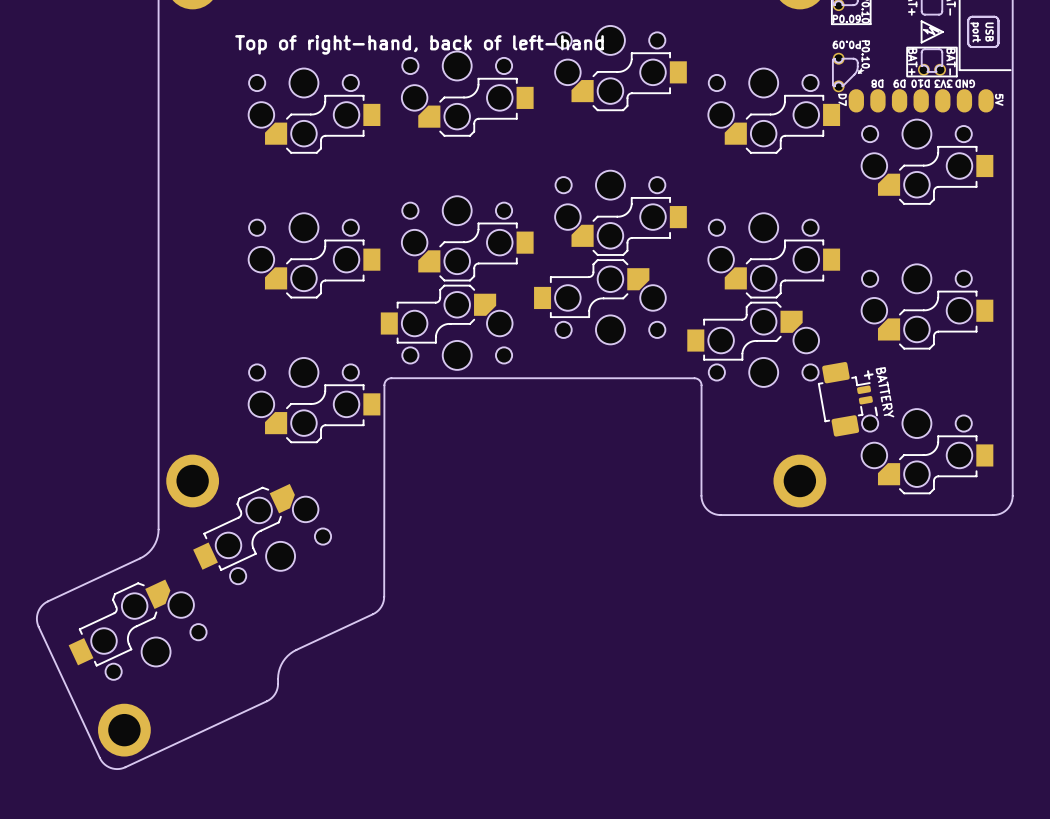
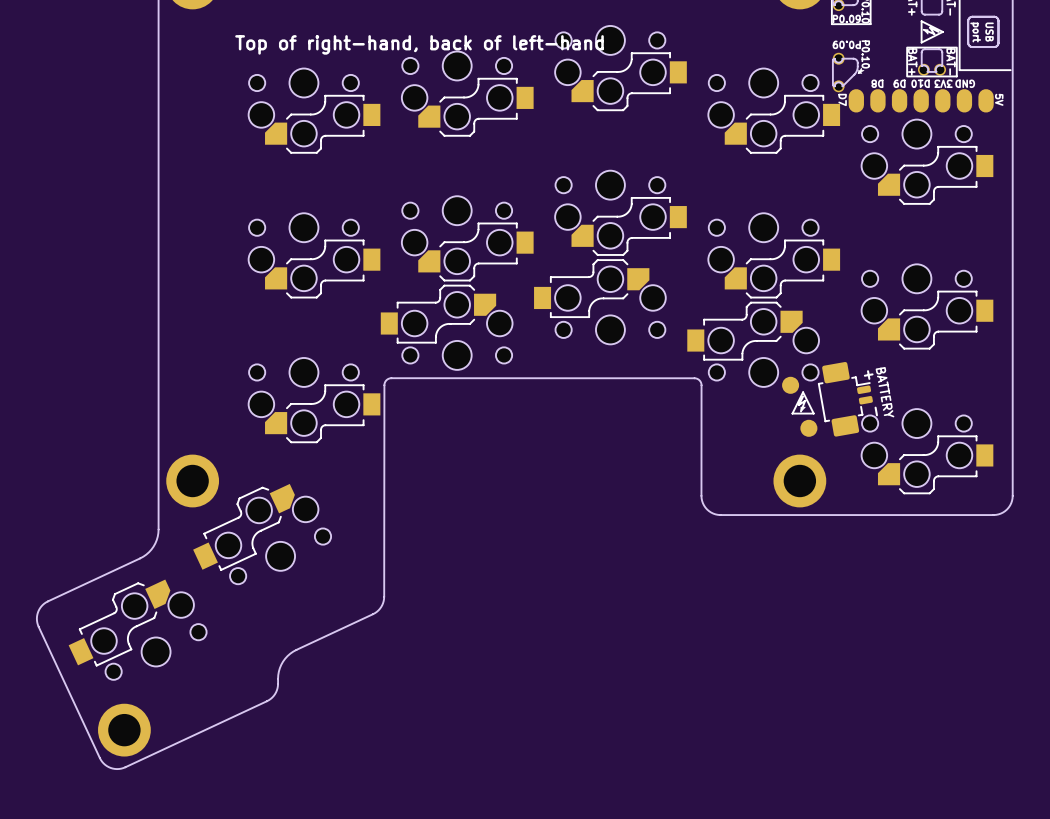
part: none -> (790, 385)
drawing: none -> [792, 391, 815, 415]
part: none -> (808, 428)

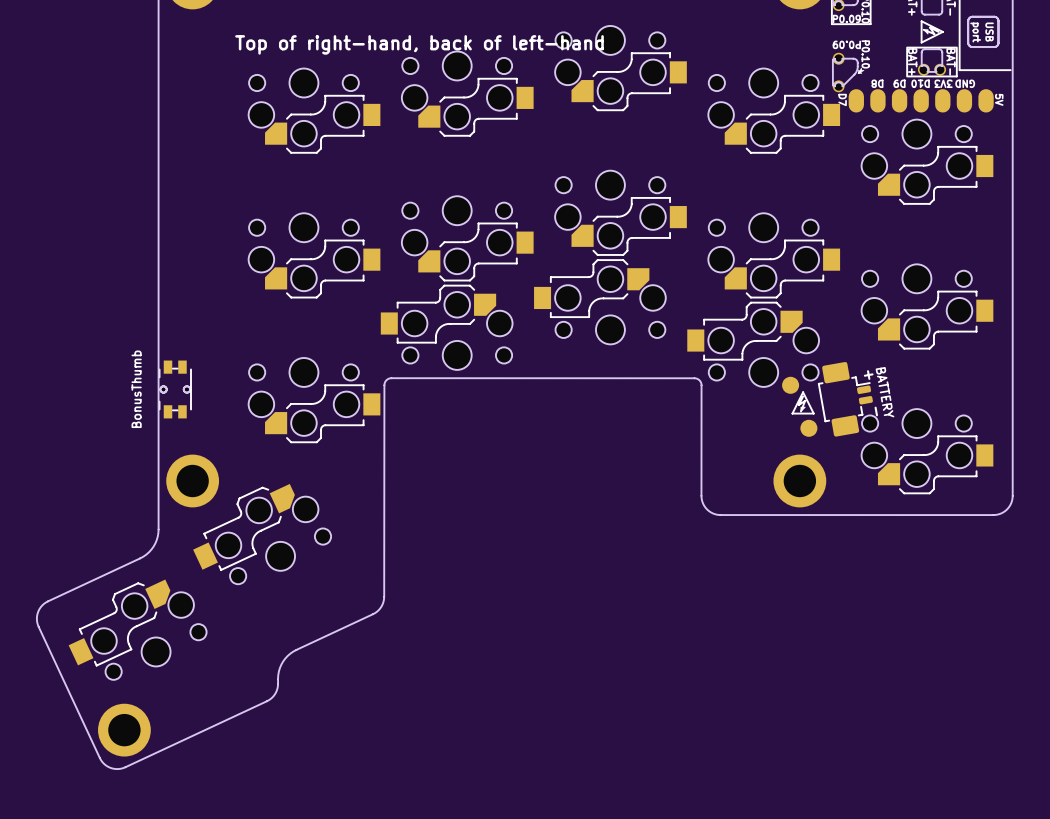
BonusThumb: none -> (175, 389)
part: none -> (175, 389)

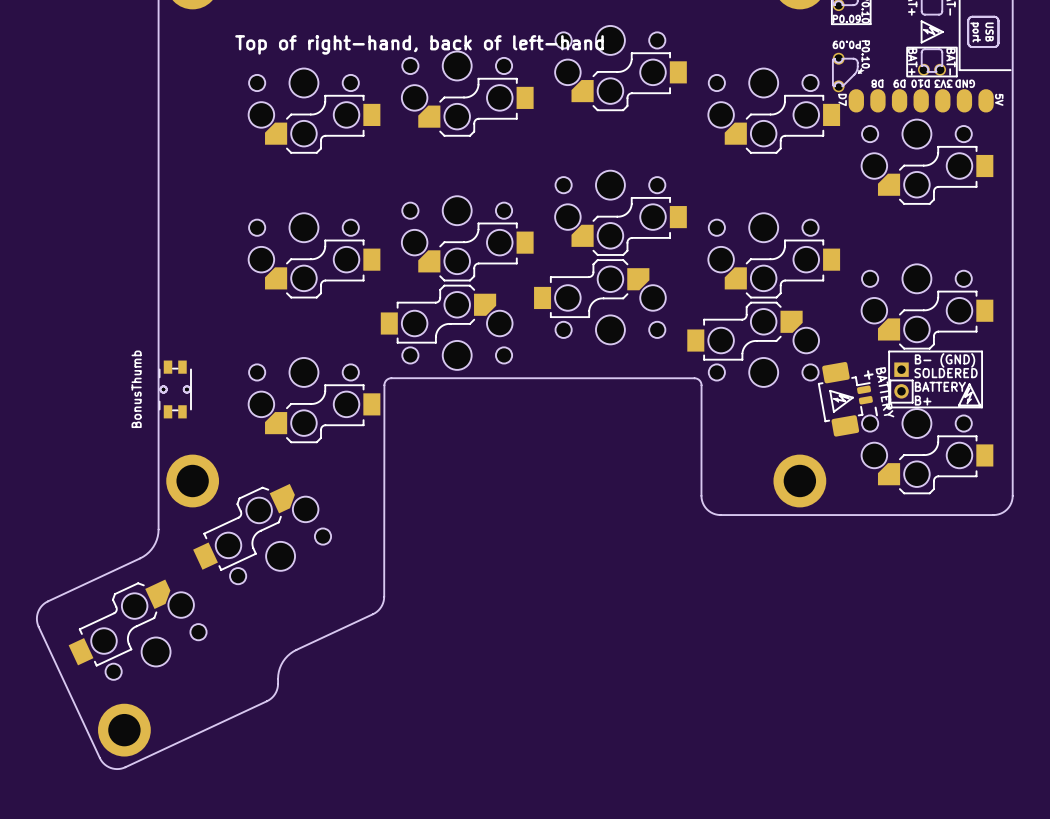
line: none -> (889, 351) (982, 351) (982, 407) (889, 407) (889, 351)
text: none -> B- (GND) (945, 360)
text: none -> SOLDERED (946, 373)
line: none -> (890, 380) (912, 380) (912, 402) (890, 402) (890, 380)
part: none -> (901, 380)
part: (790, 385) -> none
text: none -> BATTERY (940, 386)
drawing: none -> [829, 390, 854, 413]
text: none -> B+ (923, 400)
drawing position: (803, 402) -> (969, 394)
part: (808, 428) -> none

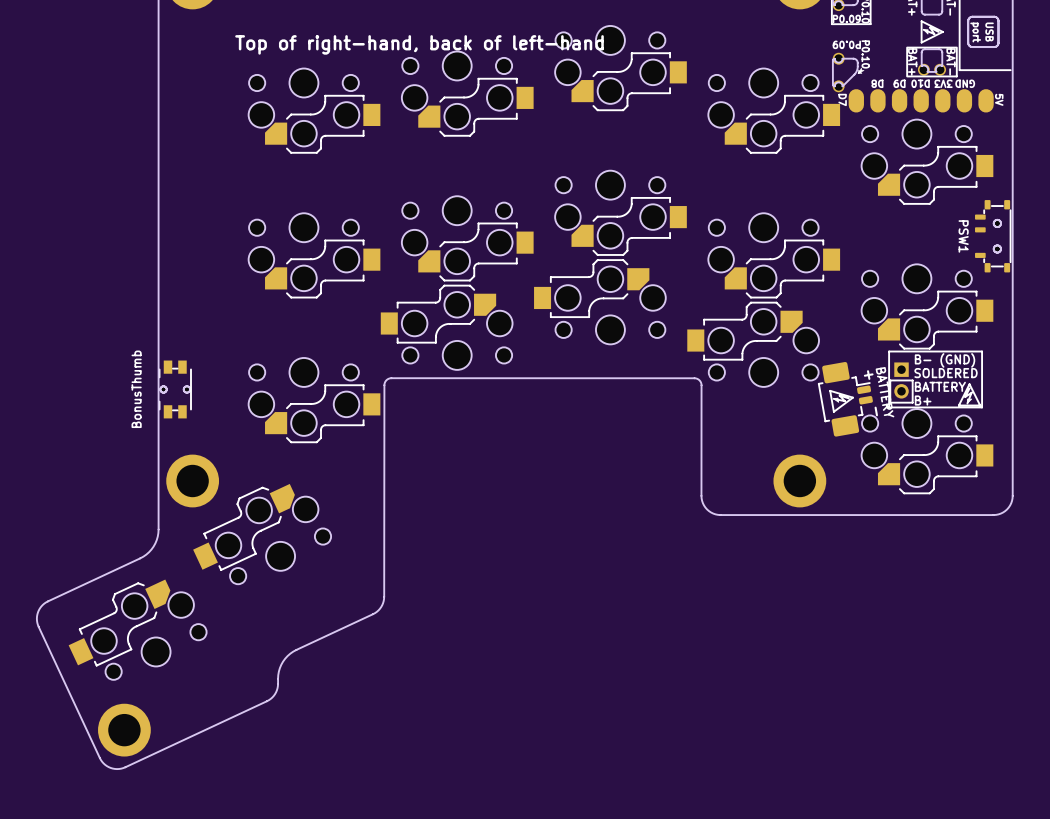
PSW1: none -> (993, 236)
part: none -> (997, 236)

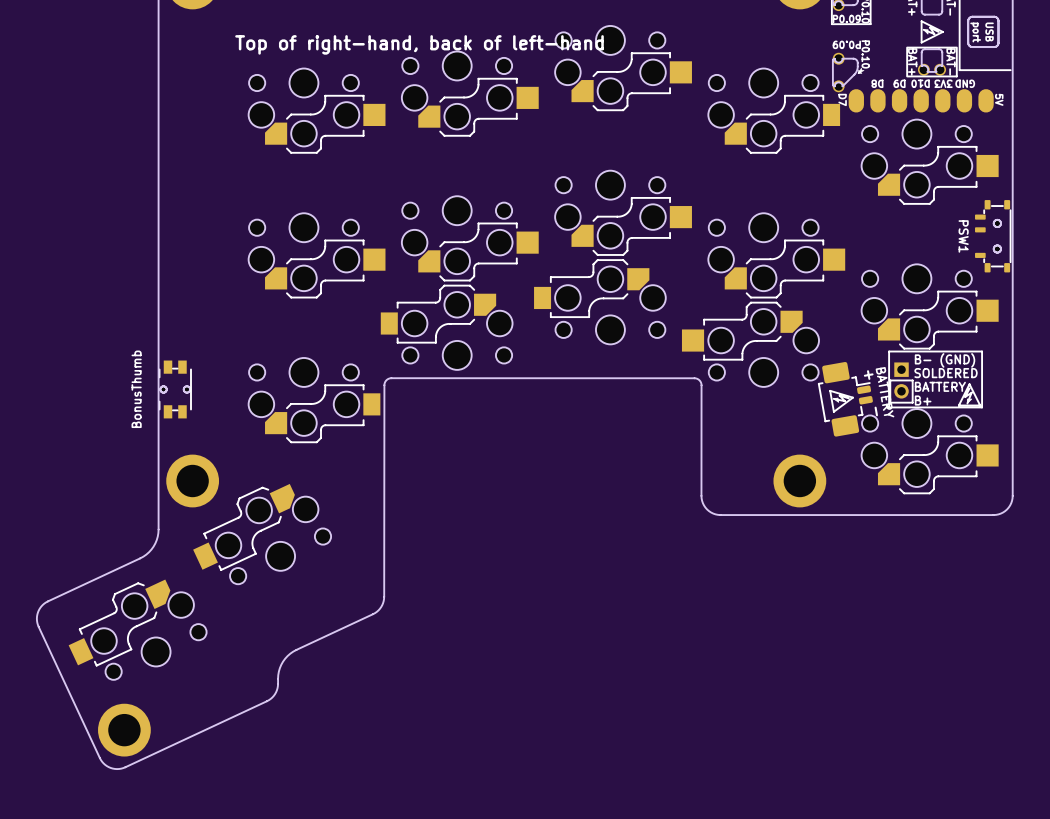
part footprint: [555, 25, 687, 111] -> [555, 25, 692, 111]
part footprint: [401, 51, 534, 137] -> [401, 51, 539, 137]
part footprint: [248, 68, 381, 154] -> [248, 68, 386, 154]
part footprint: [861, 119, 994, 205] -> [861, 119, 999, 205]
part footprint: [555, 170, 687, 256] -> [555, 170, 692, 256]
part footprint: [401, 196, 534, 282] -> [401, 196, 539, 282]
part footprint: [248, 213, 381, 299] -> [248, 213, 386, 299]
part footprint: [708, 213, 841, 299] -> [708, 213, 846, 299]
part footprint: [861, 264, 994, 350] -> [861, 264, 999, 350]
part footprint: [687, 302, 820, 387] -> [681, 302, 820, 387]
part footprint: [861, 409, 994, 494] -> [861, 409, 999, 494]

